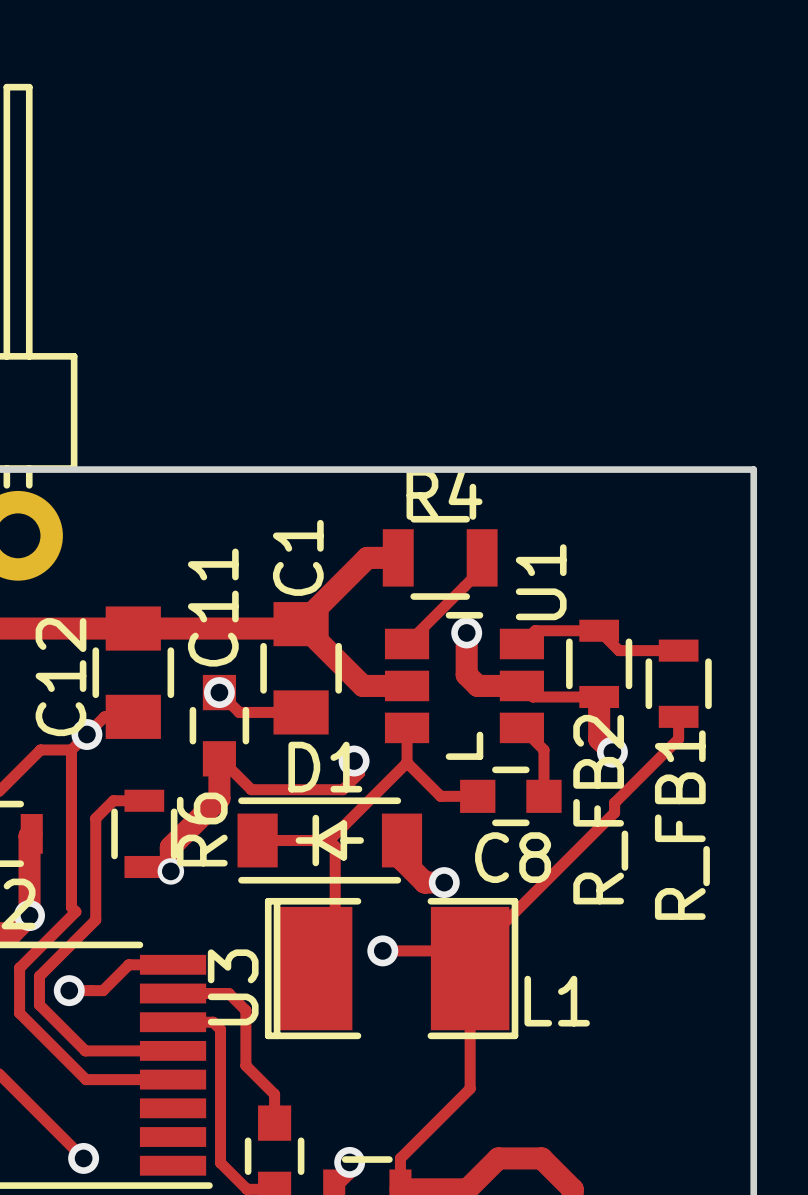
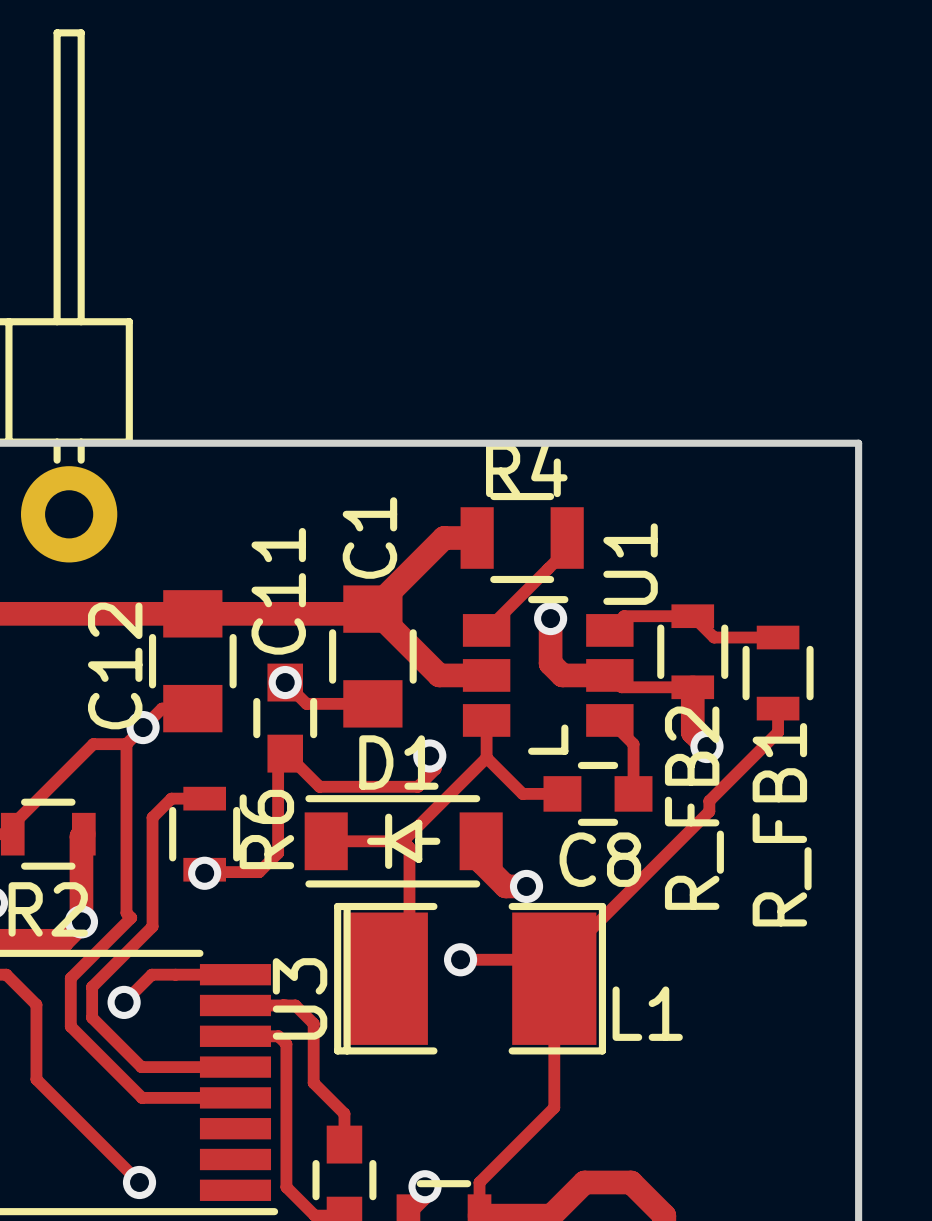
track: none -> (278, 745) (278, 853) (259, 872) (207, 872)
track: (219, 758) (219, 798) (170, 847) (170, 871) (148, 871) (144, 866) -> none
via position: (170, 871) -> (204, 873)
track: (128, 964) (103, 990) (69, 990) -> (188, 974) (151, 974) (124, 1002)

